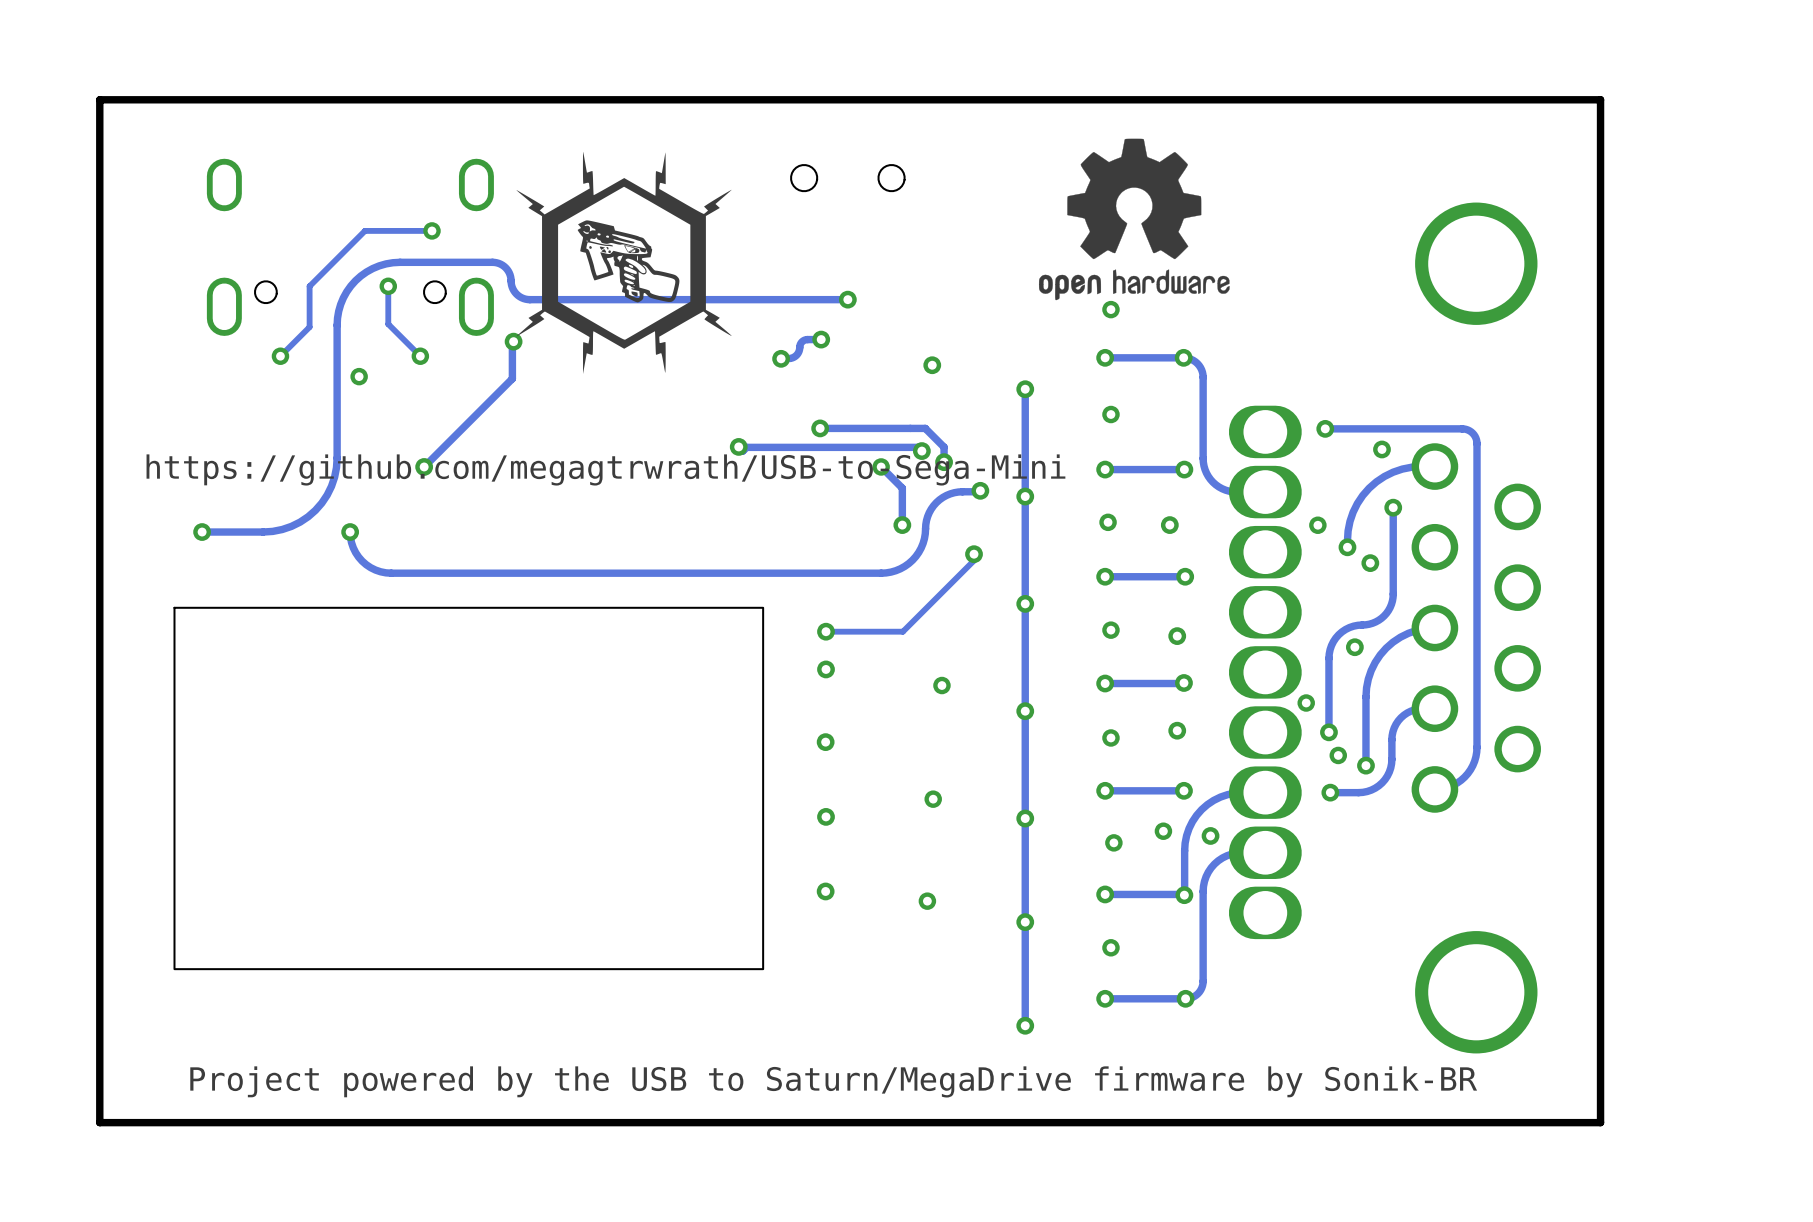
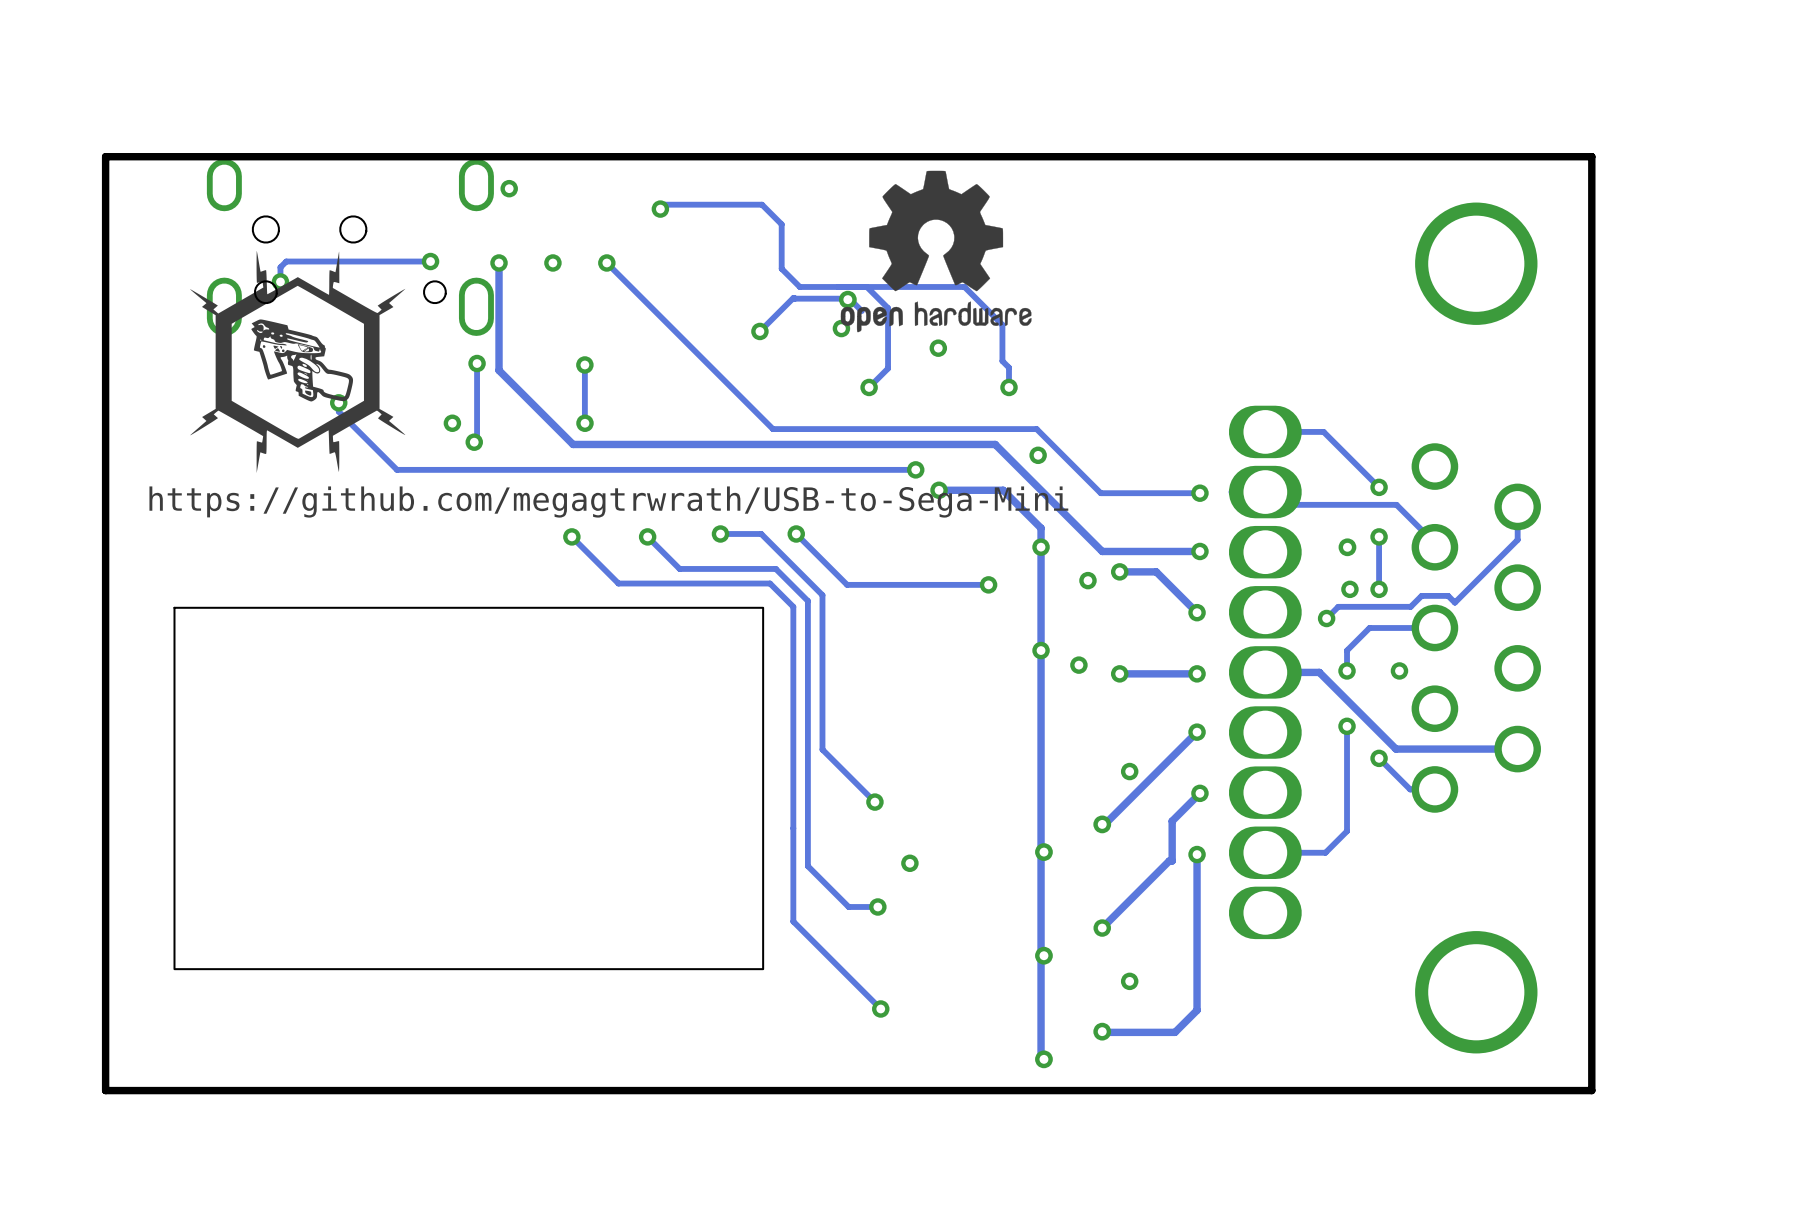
board edge: (1600, 99) (99, 99) (99, 1122) (1600, 1122) (1600, 99) -> (1591, 156) (1591, 1090) (105, 1090) (105, 156) (1591, 156)
part position: (847, 178) -> (309, 229)
via: none -> (509, 188)
track: none -> (660, 209) (664, 204) (762, 204) (781, 224) (781, 268) (799, 286) (964, 286) (1002, 324) (1002, 361) (1009, 367) (1009, 387)
via: none -> (660, 209)
drawing position: (1134, 219) -> (936, 251)
track: (431, 230) (364, 230) (309, 286) (309, 327) (280, 356) -> none
via: (431, 230) -> none
track: none -> (430, 261) (286, 261) (280, 267) (280, 281)
via: none -> (430, 261)
track: none -> (499, 262) (499, 370) (573, 444) (995, 444) (1102, 551) (1199, 551)
via: none -> (499, 262)
via: none -> (552, 262)
track: none -> (606, 262) (772, 429) (1036, 429) (1100, 493) (1199, 493)
via: none -> (606, 262)
drawing position: (624, 262) -> (297, 361)
via: none -> (280, 281)
track: (388, 286) (388, 324) (420, 356) -> none
via: (388, 286) -> none
track: none -> (866, 286) (888, 308) (888, 368) (869, 387)
track: (847, 299) (527, 299) (515, 292) (508, 270) (496, 262) (400, 262) (379, 265) (360, 276) (350, 286) (343, 297) (338, 311) (337, 458) (334, 477) (327, 495) (308, 516) (282, 529) (263, 532) (202, 532) -> none
via: (1110, 309) -> none
track: none -> (861, 311) (849, 298) (793, 297) (759, 331)
via: none -> (759, 331)
track: (821, 339) (804, 340) (795, 356) (780, 358) -> none
via position: (821, 339) -> (841, 328)
track: (513, 341) (512, 378) (424, 466) -> none
via: (513, 341) -> none
via: (280, 356) -> none
via: (420, 356) -> none
track: (1105, 357) (1183, 357) (1197, 363) (1202, 374) (1203, 458) (1205, 469) (1215, 484) (1225, 490) (1236, 492) -> (1232, 492) (1236, 492)
via: (1105, 357) -> none
via: (1183, 357) -> none
via: (781, 358) -> none
track: none -> (477, 363) (477, 439) (474, 442)
via: none -> (477, 363)
track: none -> (584, 364) (584, 423)
via: none -> (584, 364)
via position: (932, 365) -> (938, 348)
via position: (359, 376) -> (338, 402)
via: none -> (869, 387)
track: (1025, 389) (1025, 1025) -> none
via position: (1025, 389) -> (1009, 387)
track: none -> (338, 402) (338, 411) (397, 469) (915, 469)
via: (1110, 414) -> none
via: none -> (452, 423)
via: none -> (584, 423)
track: (820, 428) (925, 428) (944, 447) (944, 462) -> none
via: (820, 428) -> none
track: (1325, 428) (1464, 428) (1471, 431) (1476, 439) (1476, 752) (1472, 765) (1461, 780) (1448, 787) (1434, 789) -> (1379, 758) (1410, 789) (1434, 789)
via: (1325, 428) -> none
track: none -> (1265, 431) (1323, 431) (1379, 487)
via: none -> (474, 442)
track: (738, 446) (742, 451) (746, 447) (918, 447) (921, 451) -> none
via: (738, 446) -> none
via: (1381, 449) -> none
via: (921, 451) -> none
via: none -> (1038, 455)
via: (944, 462) -> none
via: (424, 466) -> none
track: (881, 466) (902, 488) (902, 525) -> none
via: (881, 466) -> none
track: (1421, 466) (1393, 472) (1369, 488) (1353, 512) (1348, 530) (1347, 547) -> none
text position: https://github.com/megagtrwrath/USB-to-Sega-Mini (605, 469) -> https://github.com/megagtrwrath/USB-to-Sega-Mini (608, 502)
via: none -> (915, 469)
via: (1105, 469) -> none
track: (1184, 469) (1105, 469) -> none
via: (1184, 469) -> none
via: none -> (1379, 487)
track: none -> (939, 490) (1003, 490) (1041, 528) (1041, 1056) (1043, 1059)
via: none -> (939, 490)
via: (980, 490) -> none
track: (977, 491) (954, 492) (939, 499) (929, 512) (923, 543) (915, 556) (900, 568) (886, 572) (385, 572) (375, 570) (362, 561) (353, 547) (350, 532) -> none
track: none -> (1265, 492) (1278, 504) (1396, 504) (1434, 543) (1434, 547)
via: none -> (1199, 493)
via: (1025, 496) -> none
track: none -> (1517, 506) (1517, 539) (1454, 602) (1448, 595) (1421, 595) (1410, 606) (1338, 606) (1326, 618)
track: (1393, 507) (1392, 600) (1388, 610) (1381, 618) (1372, 623) (1345, 629) (1338, 634) (1331, 645) (1328, 658) (1328, 732) -> none
via: (1393, 507) -> none
via: (1108, 522) -> none
via: (902, 525) -> none
via: (1169, 525) -> none
via: (1317, 525) -> none
via: (202, 532) -> none
via: (350, 532) -> none
track: none -> (720, 533) (761, 533) (822, 595) (822, 749) (874, 802)
via: none -> (720, 533)
track: none -> (796, 533) (847, 584) (988, 584)
via: none -> (796, 533)
track: none -> (571, 536) (618, 583) (770, 583) (793, 606) (793, 921) (880, 1008)
via: none -> (571, 536)
track: none -> (647, 536) (679, 568) (775, 568) (807, 601) (807, 866) (848, 906) (877, 906)
via: none -> (647, 536)
track: none -> (1379, 536) (1379, 589)
via: none -> (1379, 536)
via: none -> (1041, 547)
via: none -> (1199, 551)
track: (974, 554) (974, 560) (902, 631) (826, 631) -> none
via: (974, 554) -> none
via: (1370, 563) -> none
track: none -> (1119, 571) (1156, 571) (1197, 612)
via: none -> (1119, 571)
via: (1105, 576) -> none
track: (1185, 576) (1105, 576) -> none
via: (1185, 576) -> none
via: none -> (1087, 580)
via: none -> (988, 584)
via: none -> (1349, 589)
via: none -> (1379, 589)
via: (1025, 603) -> none
via: none -> (1197, 612)
via: none -> (1326, 618)
track: (1434, 627) (1417, 630) (1400, 637) (1386, 648) (1375, 662) (1366, 687) (1365, 765) -> (1434, 627) (1369, 627) (1347, 650) (1347, 670)
via: (1110, 630) -> none
via: (826, 631) -> none
via: (1177, 636) -> none
via: (1354, 647) -> none
via: none -> (1041, 650)
via: none -> (1078, 665)
via: (826, 669) -> none
via: none -> (1347, 670)
via: none -> (1399, 670)
track: none -> (1265, 672) (1319, 672) (1396, 749) (1517, 749)
track: none -> (1197, 673) (1119, 673)
via position: (1183, 682) -> (1197, 673)
via position: (1105, 683) -> (1119, 673)
track: (1183, 683) (1105, 683) -> none
via: (941, 685) -> none
via: (1306, 703) -> none
track: (1422, 708) (1407, 712) (1396, 724) (1392, 735) (1390, 767) (1382, 782) (1375, 788) (1362, 792) (1330, 792) -> none
via: (1025, 711) -> none
track: none -> (1347, 726) (1347, 831) (1325, 852) (1255, 852)
via: none -> (1347, 726)
via position: (1177, 730) -> (1197, 732)
track: none -> (1197, 732) (1104, 824) (1102, 824)
via: (1328, 732) -> none
via: (1110, 737) -> none
via: (825, 742) -> none
via: (1338, 755) -> none
via position: (1365, 765) -> (1379, 758)
via: none -> (1129, 771)
via: (1105, 790) -> none
track: (1183, 790) (1105, 790) -> none
via position: (1183, 790) -> (1199, 793)
track: (1242, 792) (1227, 794) (1213, 800) (1201, 809) (1192, 821) (1185, 843) (1184, 895) (1105, 894) -> none
via: (1330, 792) -> none
track: none -> (1199, 793) (1172, 821) (1172, 861) (1169, 861) (1102, 928)
via: (933, 799) -> none
via: none -> (874, 802)
via: (826, 816) -> none
via: (1025, 818) -> none
via: none -> (1102, 824)
via: (1163, 831) -> none
via: (1210, 835) -> none
via: (1113, 842) -> none
via: none -> (1043, 852)
track: (1241, 852) (1227, 855) (1218, 860) (1208, 872) (1204, 881) (1203, 981) (1197, 993) (1185, 998) (1105, 998) -> (1241, 852) (1235, 852)
track: none -> (1197, 854) (1197, 1010) (1175, 1032) (1105, 1032)
via: none -> (1197, 854)
via: none -> (909, 863)
via: (825, 891) -> none
via: (1105, 894) -> none
via: (1184, 895) -> none
via: (927, 901) -> none
via: none -> (877, 906)
via: (1025, 922) -> none
via: none -> (1102, 928)
via: (1110, 947) -> none
via: none -> (1043, 955)
via: none -> (1129, 981)
via: (1105, 998) -> none
via: (1185, 998) -> none
via: none -> (880, 1008)
via: (1025, 1025) -> none
via: none -> (1102, 1031)
via: none -> (1043, 1059)
text: Project powered by the USB to Saturn/MegaDrive firmware by Sonik-BR (833, 1081) -> none

